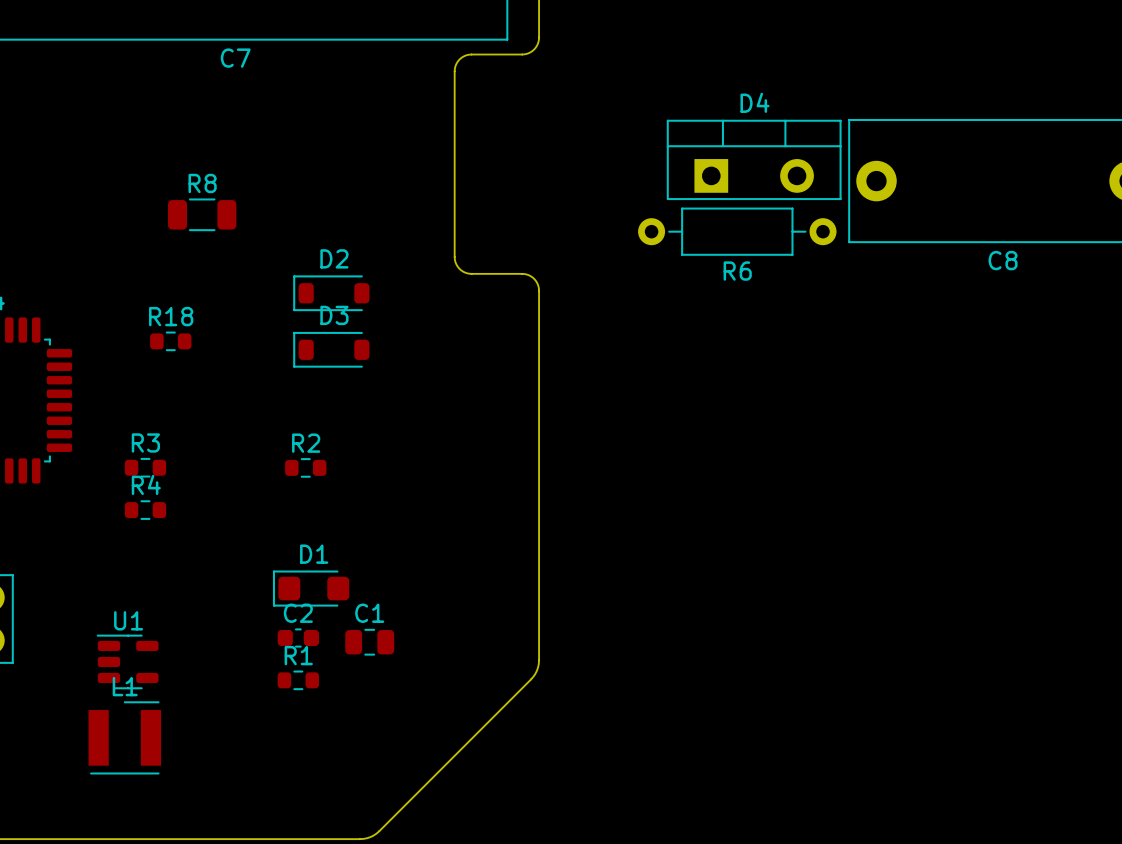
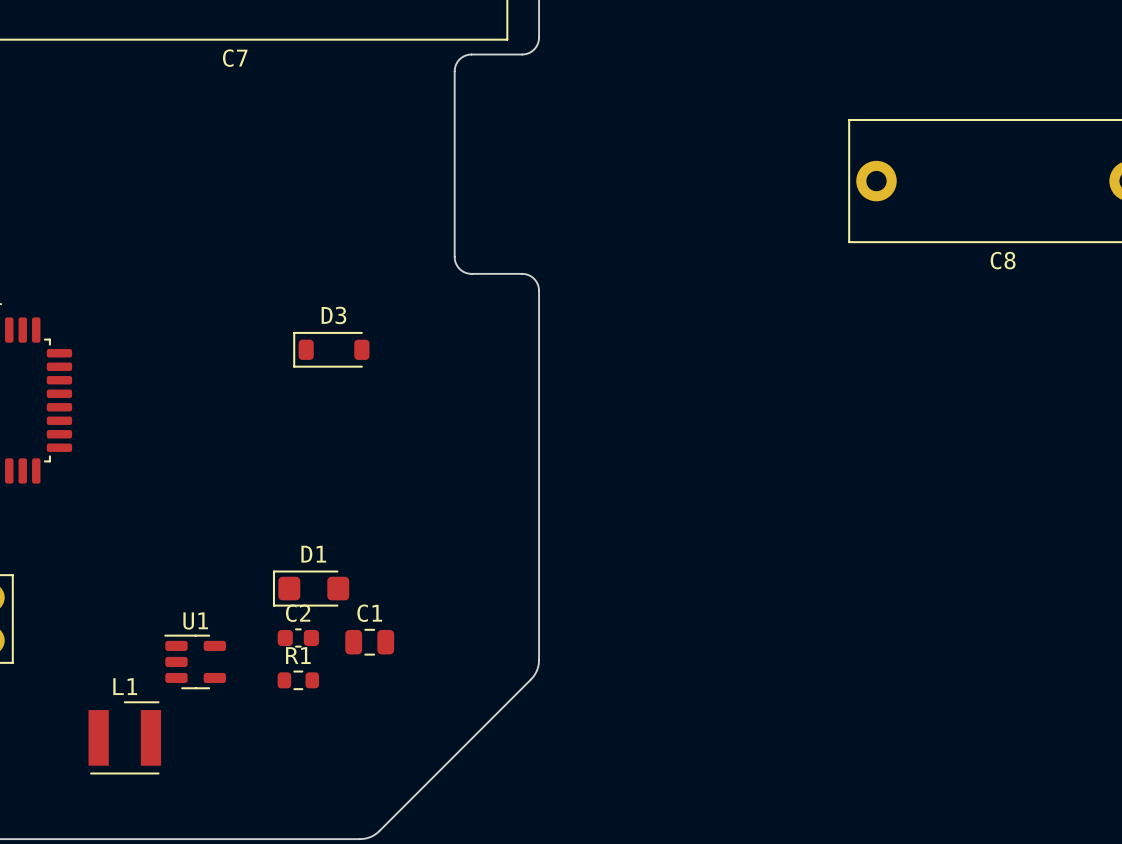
D4: (754, 159) -> none
R8: (202, 214) -> none
R6: (737, 231) -> none
D2: (331, 293) -> none
R18: (170, 341) -> none
R3: (145, 467) -> none
R2: (305, 467) -> none
R4: (145, 510) -> none
U1 position: (127, 661) -> (195, 661)

